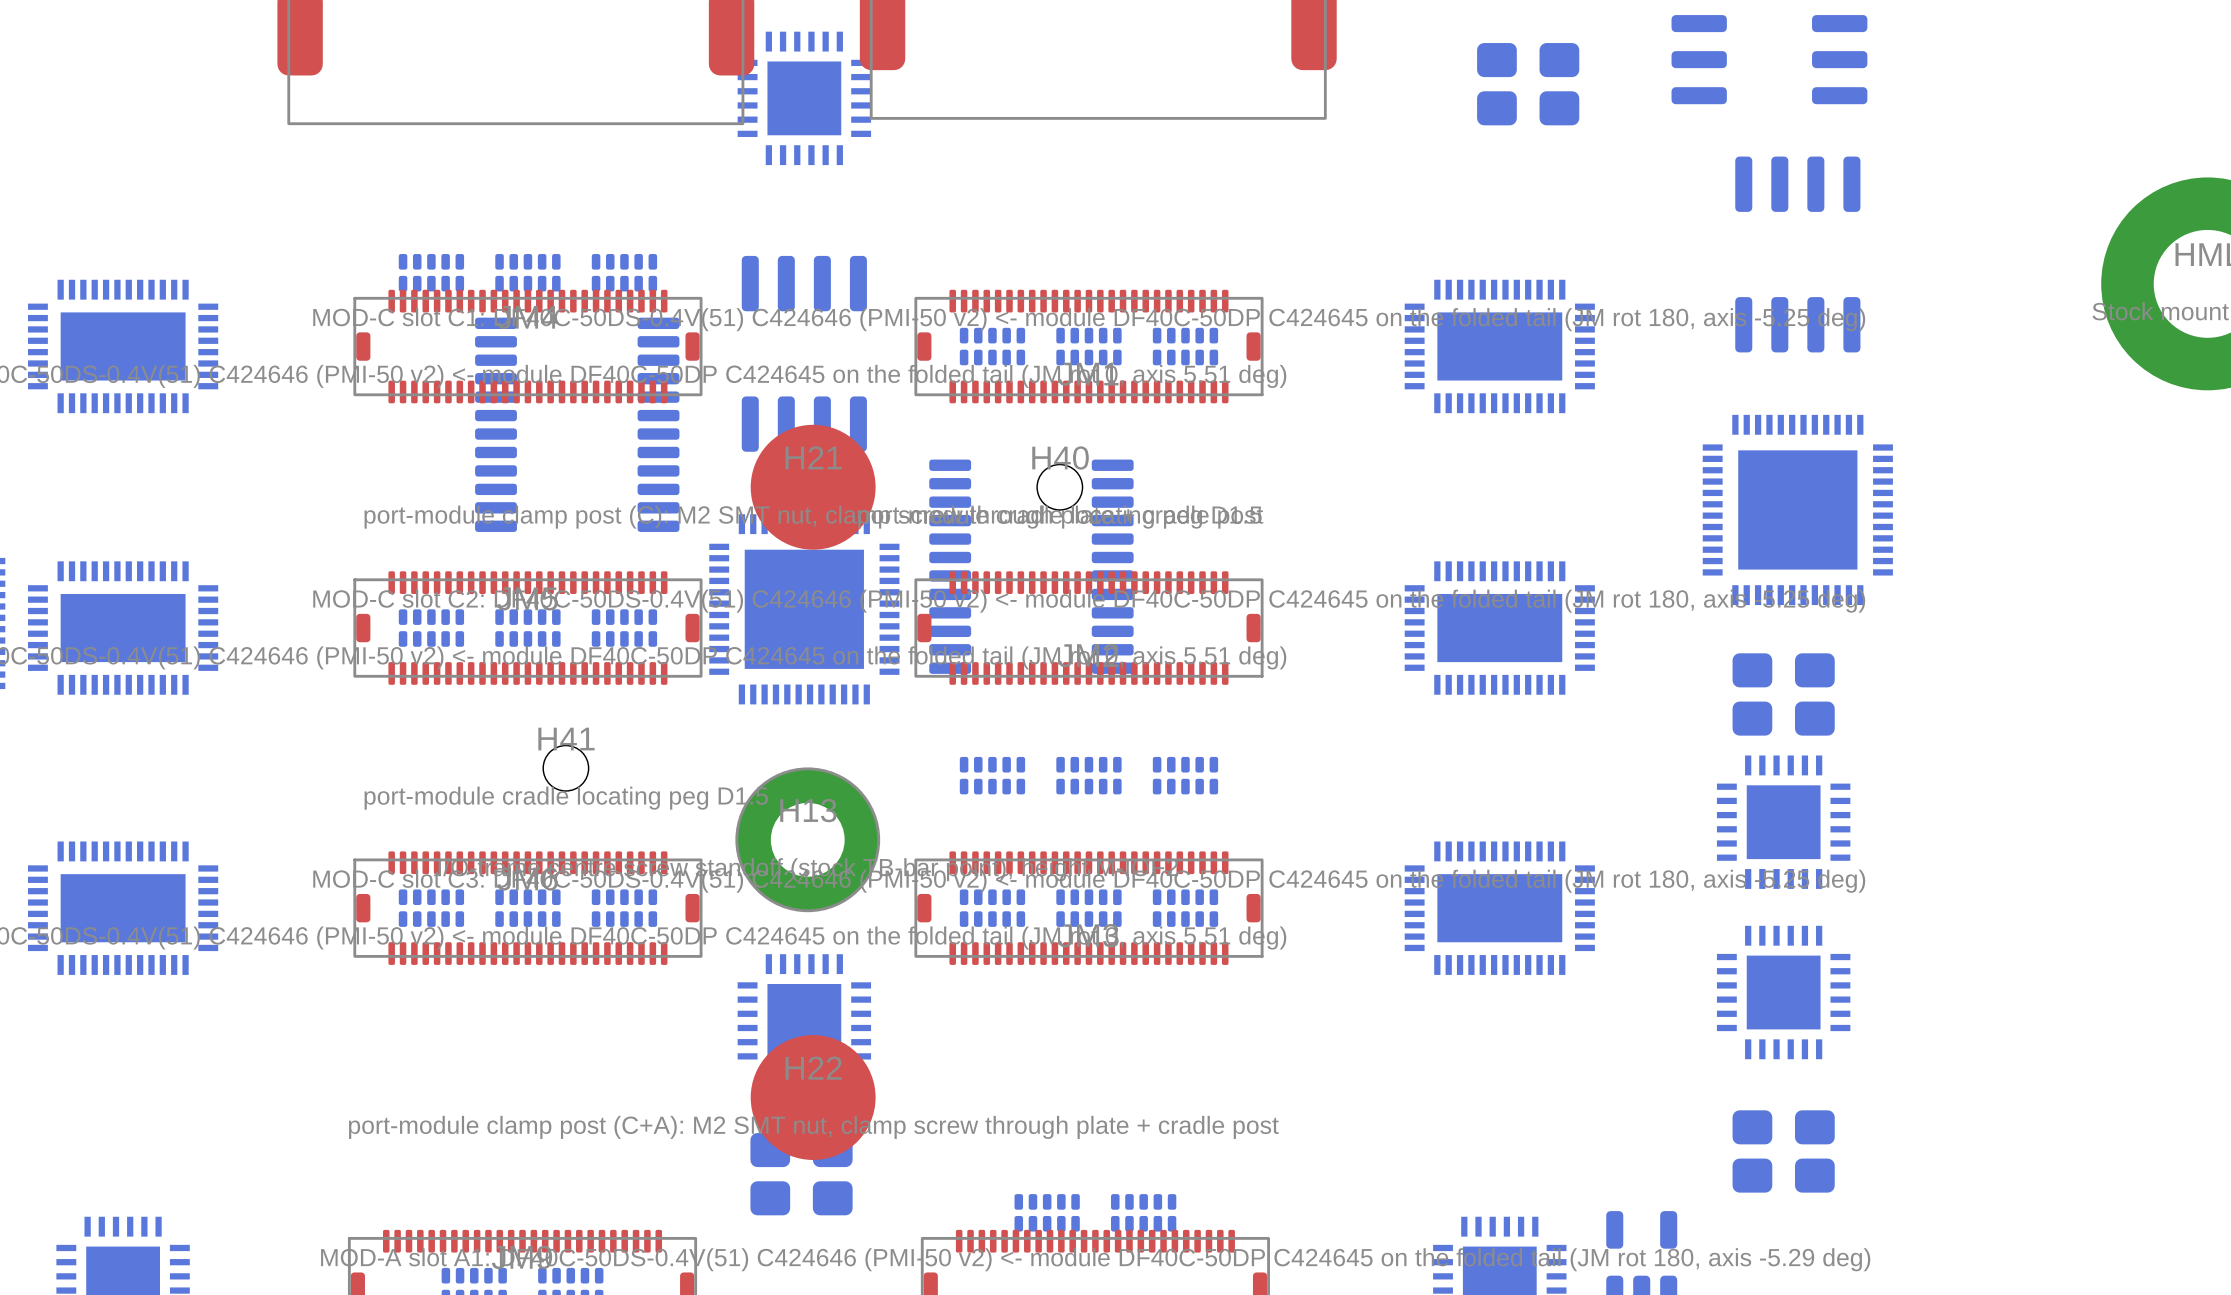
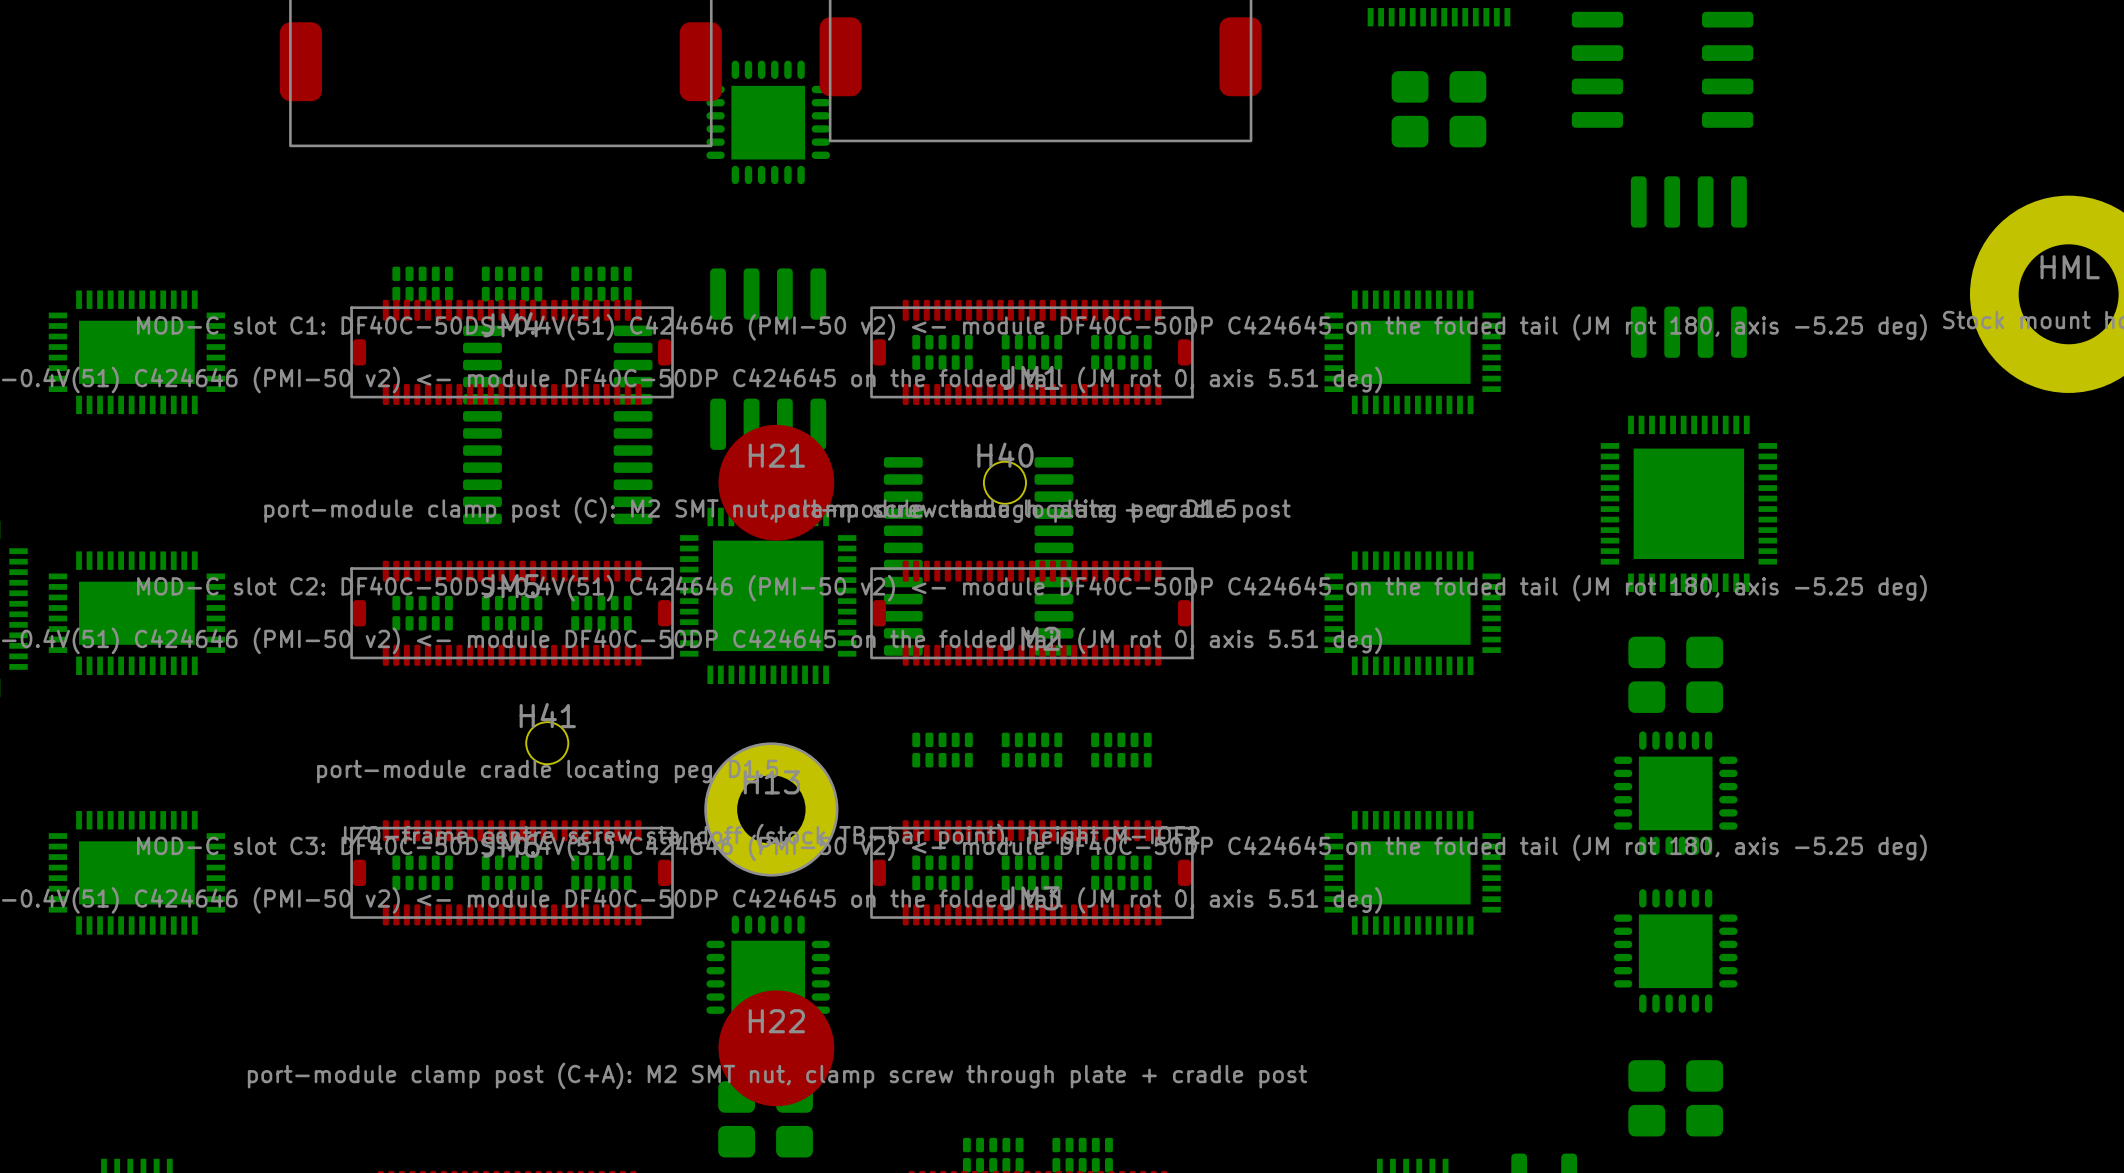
part footprint: [737, 31, 872, 166] -> [706, 60, 831, 185]
part footprint: [1716, 755, 1851, 889] -> [1613, 731, 1738, 855]
part footprint: [1716, 925, 1851, 1060] -> [1613, 889, 1738, 1013]
part footprint: [737, 954, 872, 1088] -> [706, 915, 831, 1040]

